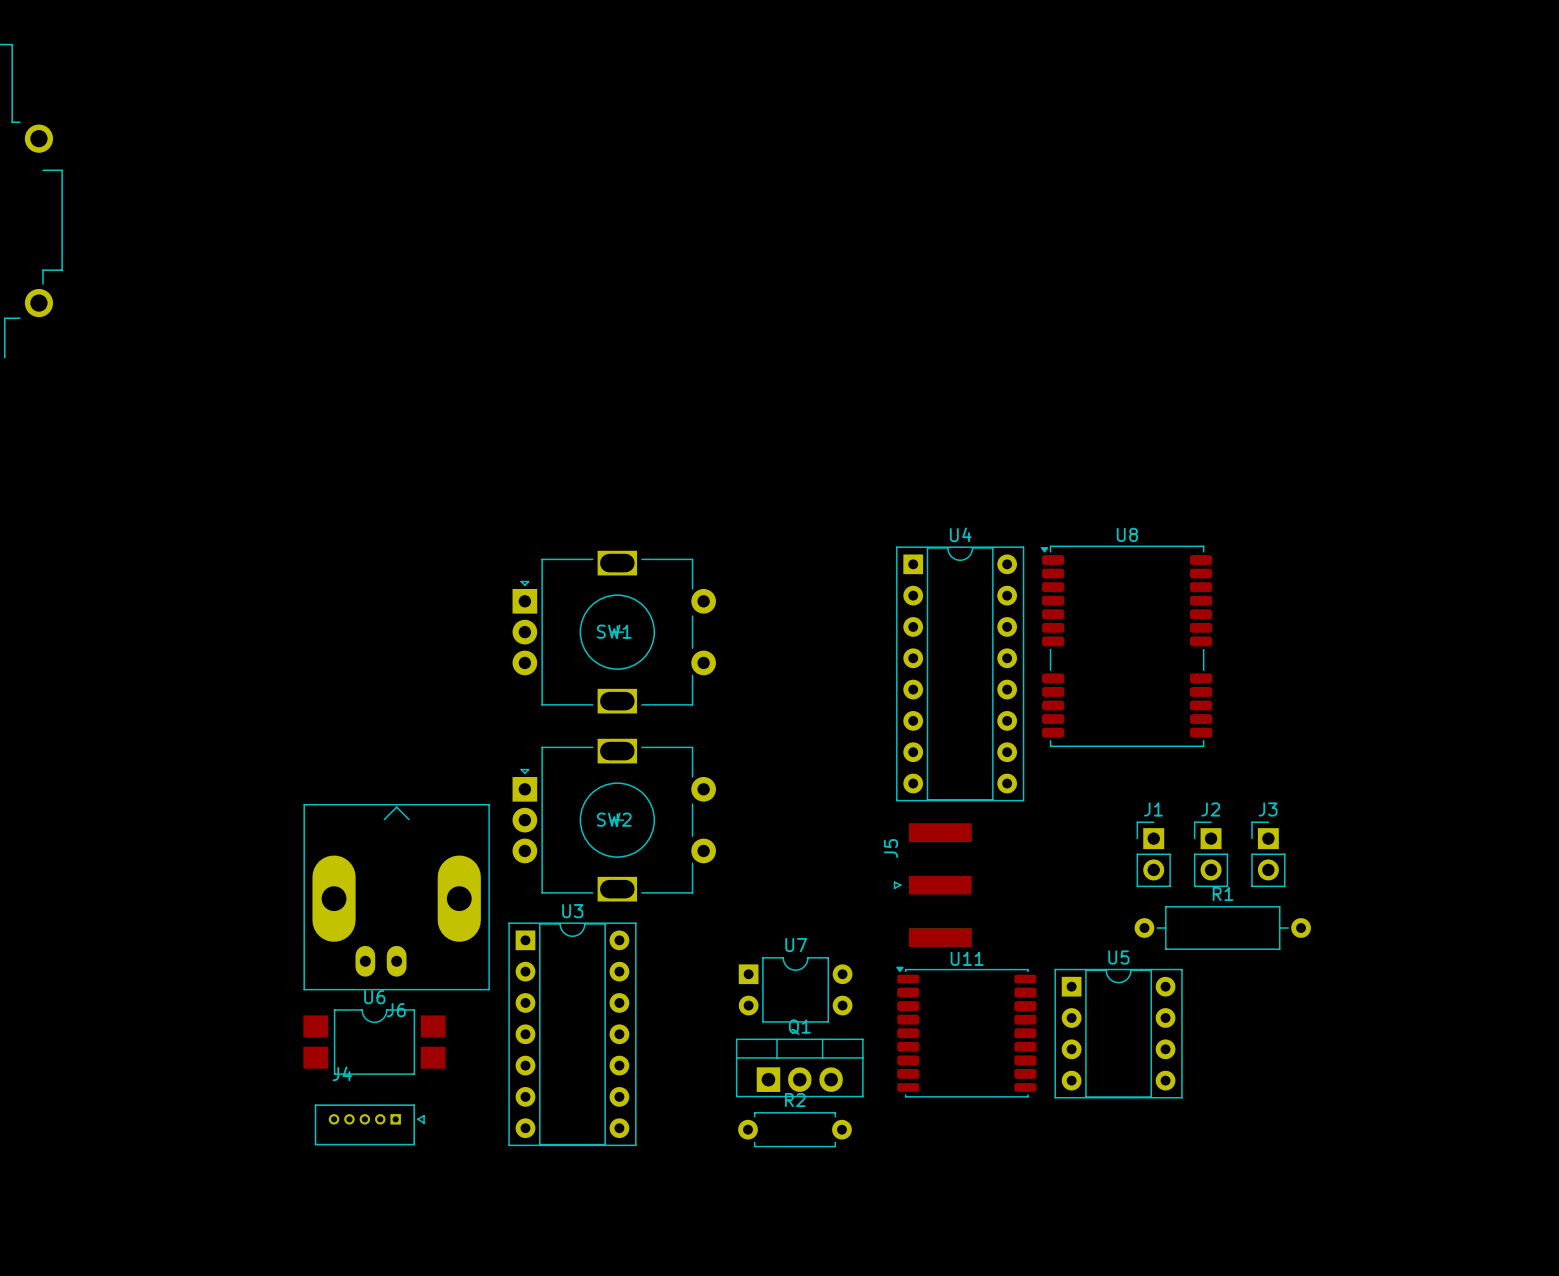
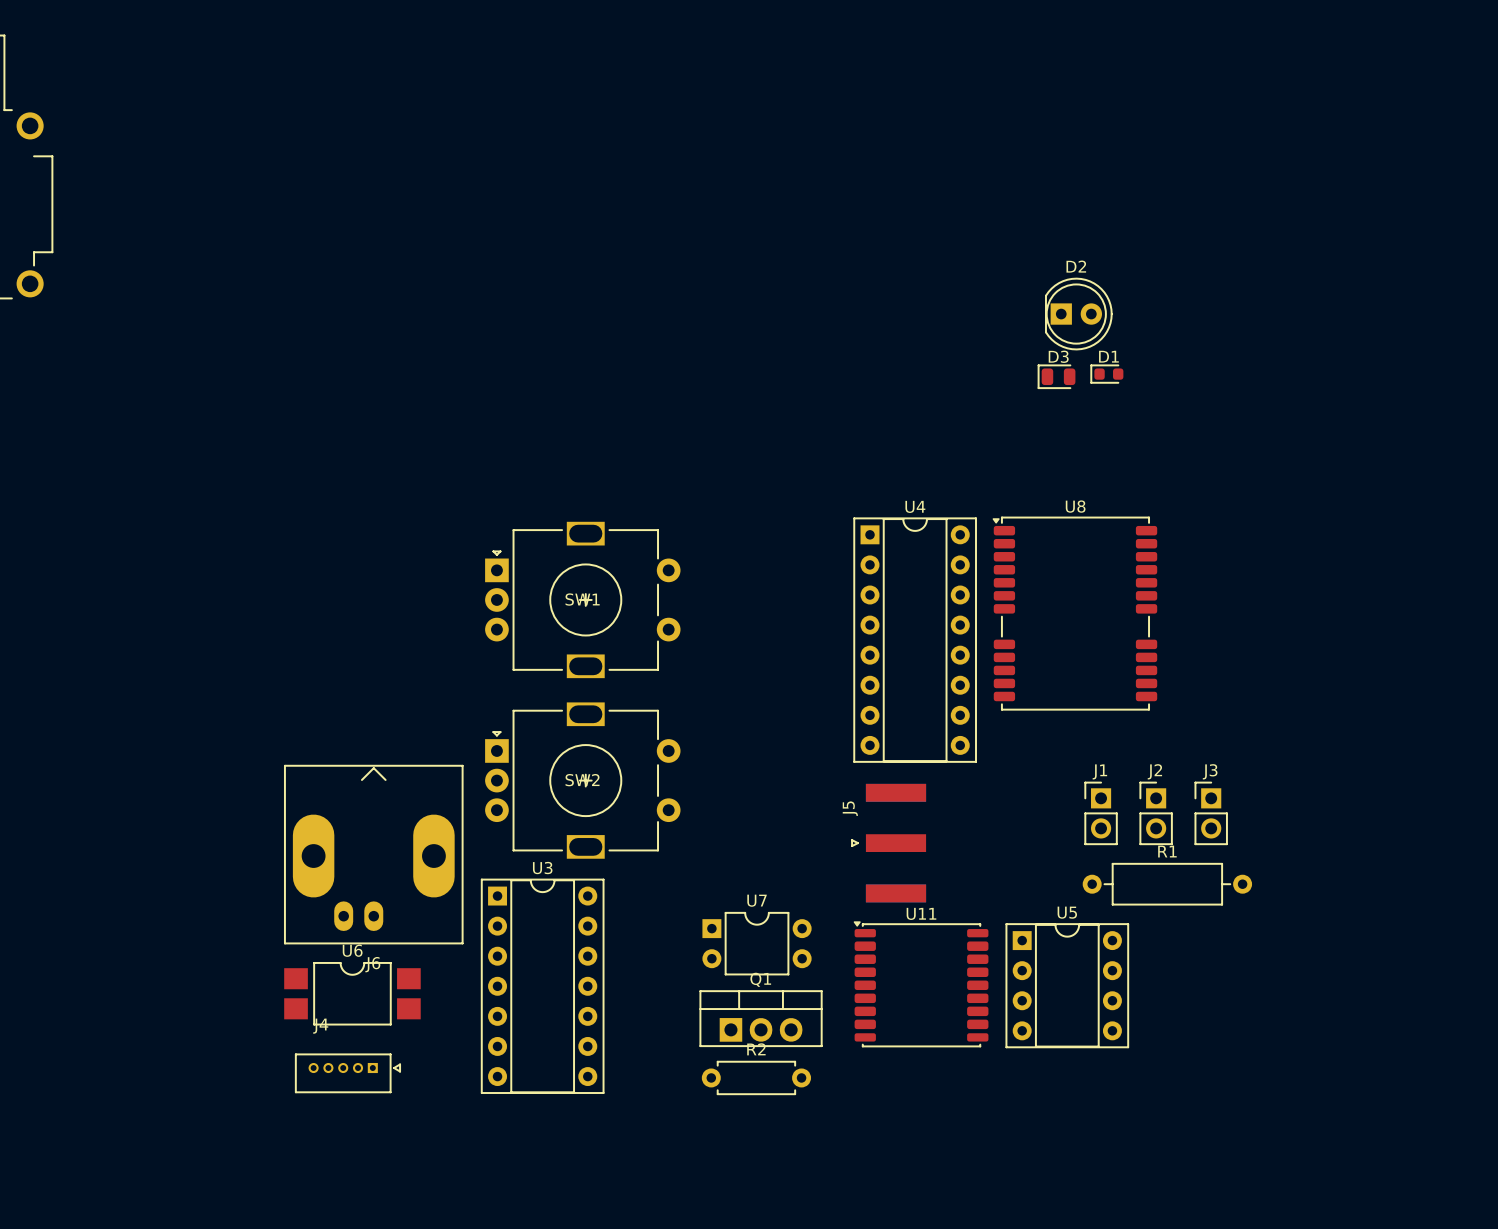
D2: none -> (1078, 314)
D1: none -> (1106, 374)
D3: none -> (1056, 376)

